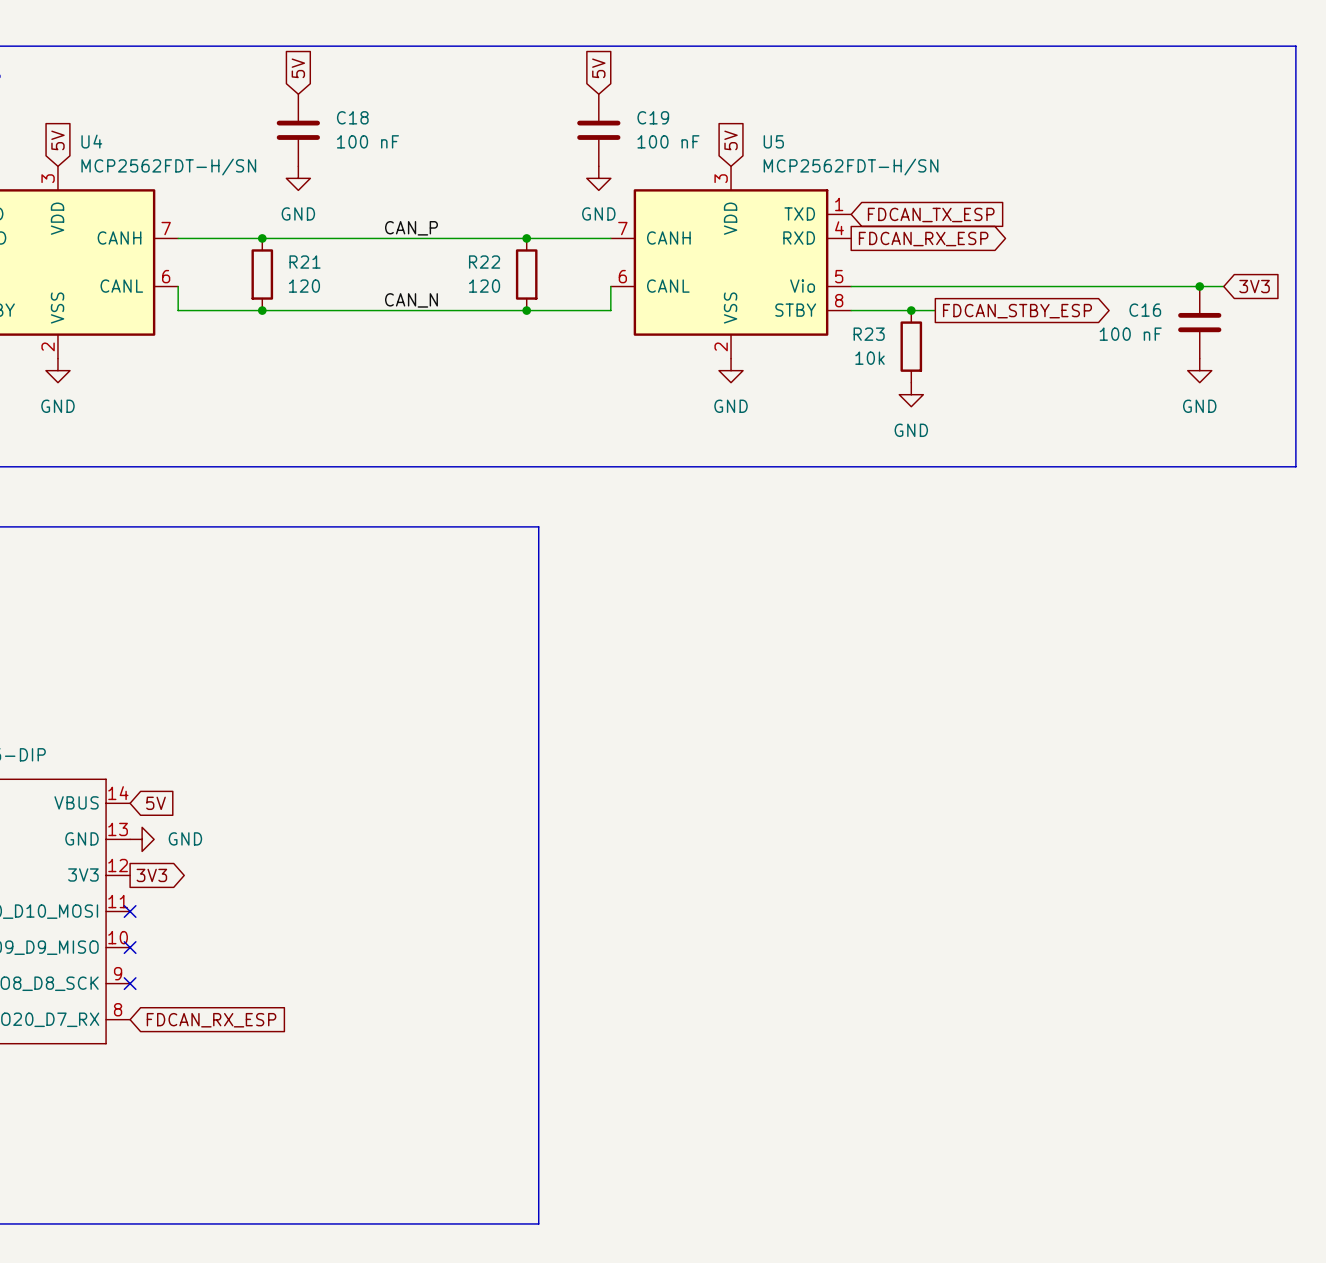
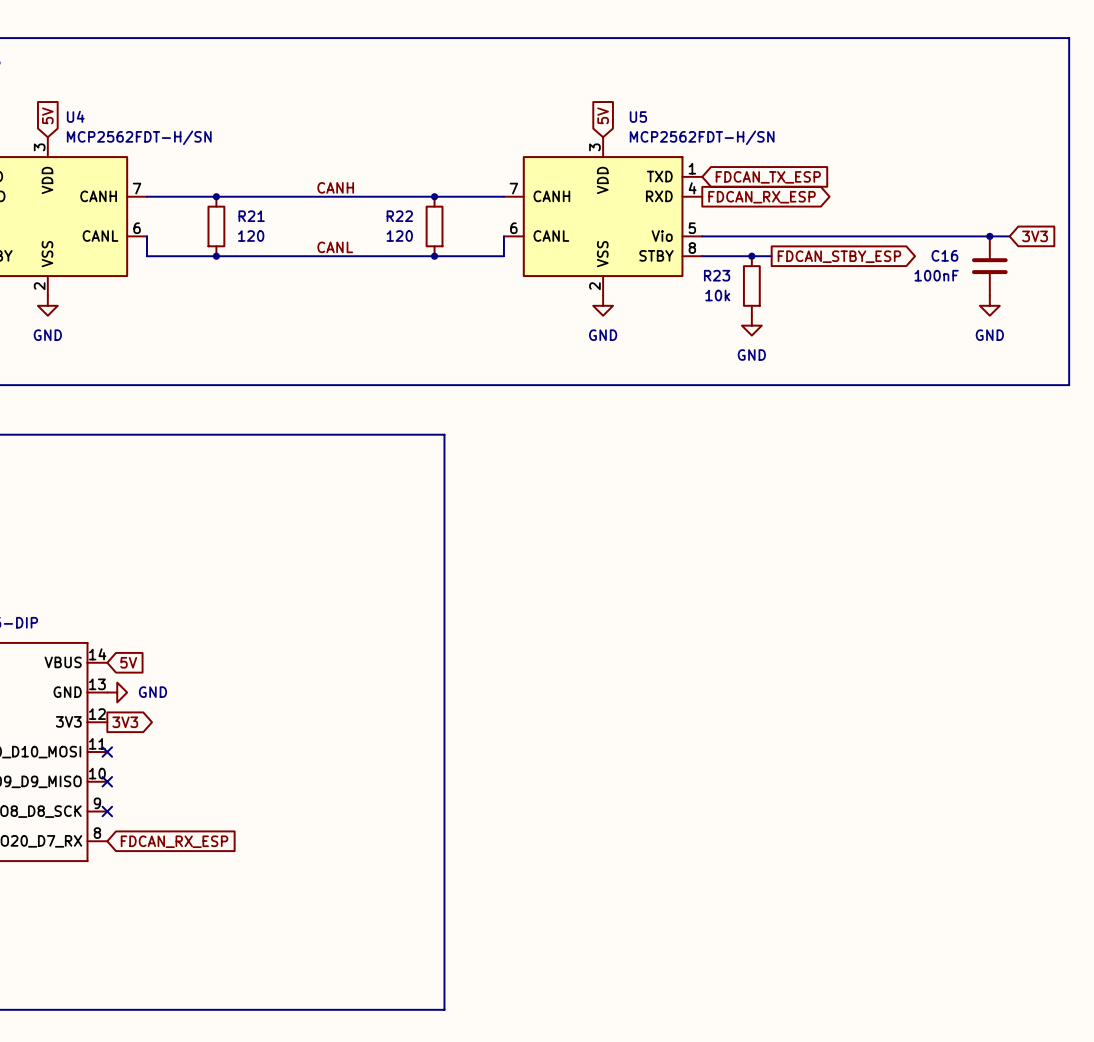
global label: 5V (298, 68) -> none
global label: 5V (598, 68) -> none
C18: 100 nF (298, 130) -> none
C19: 100 nF (598, 130) -> none
power symbol: GND (298, 178) -> none
power symbol: GND (598, 178) -> none
label: CAN_P (411, 228) -> CANH (335, 187)
label: CAN_N (411, 300) -> CANL (335, 247)
C16 value: 100 nF (1130, 334) -> 100nF (936, 275)

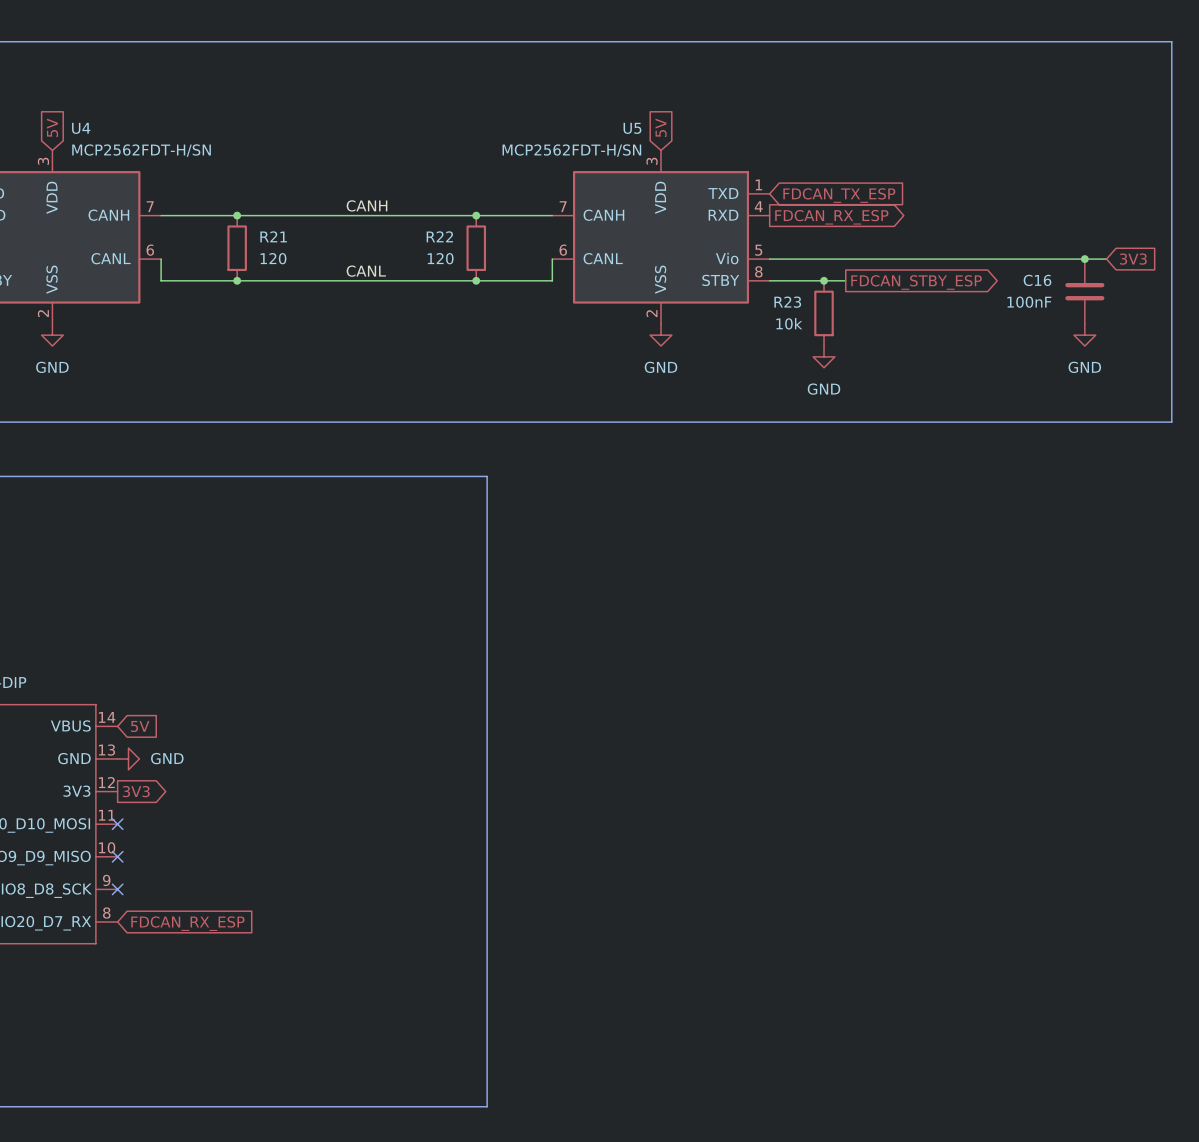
U5 name position: U5 (638, 117) -> U5 (632, 128)
U5 value position: MCP2562FDT-H/SN (702, 137) -> MCP2562FDT-H/SN (571, 150)

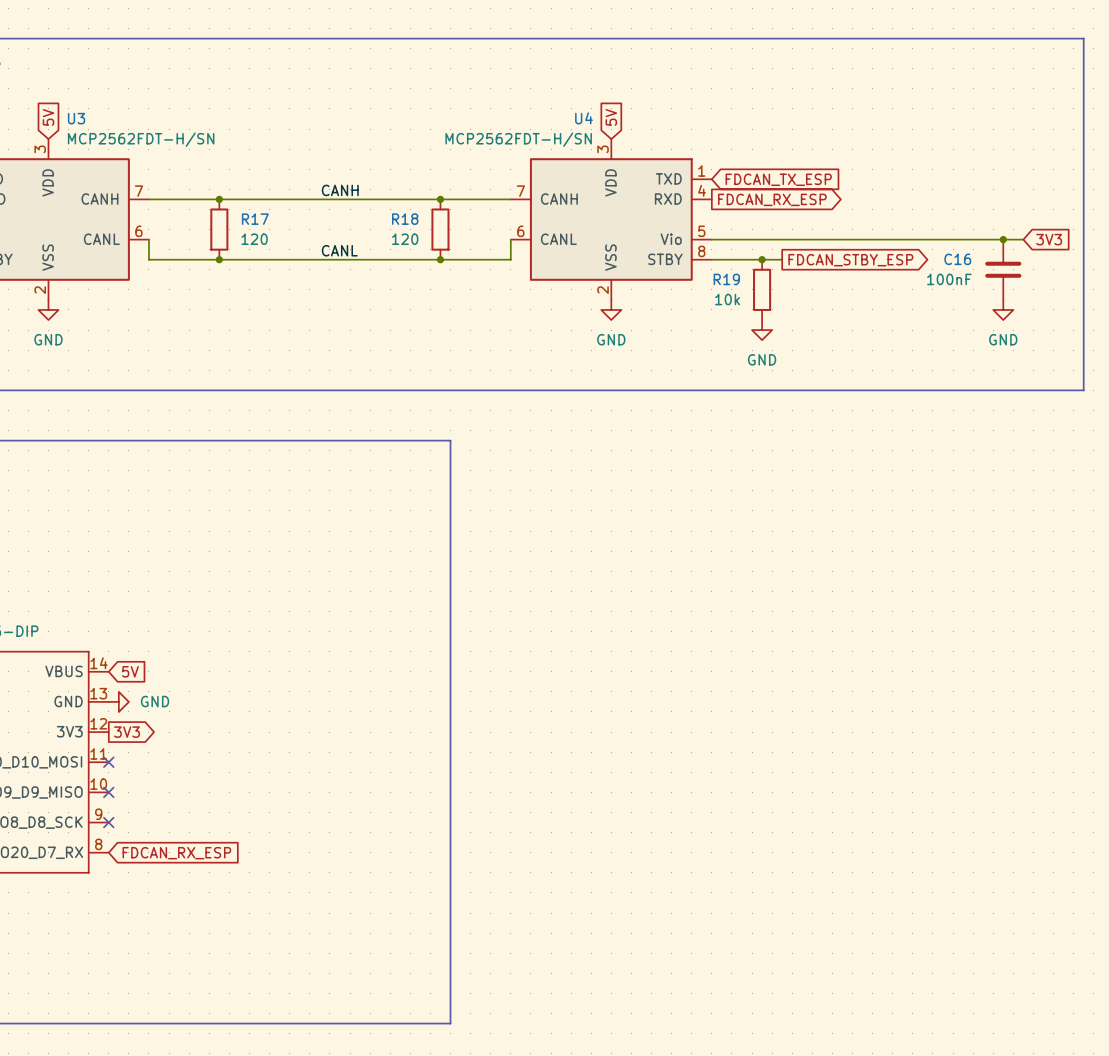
U4 name: U4 (81, 128) -> U3 (76, 118)
U5 name: U5 (632, 128) -> U4 (583, 118)
R21 name: R21 (273, 236) -> R17 (255, 219)
R22 name: R22 (439, 236) -> R18 (405, 219)
R23 name: R23 (787, 302) -> R19 (726, 279)

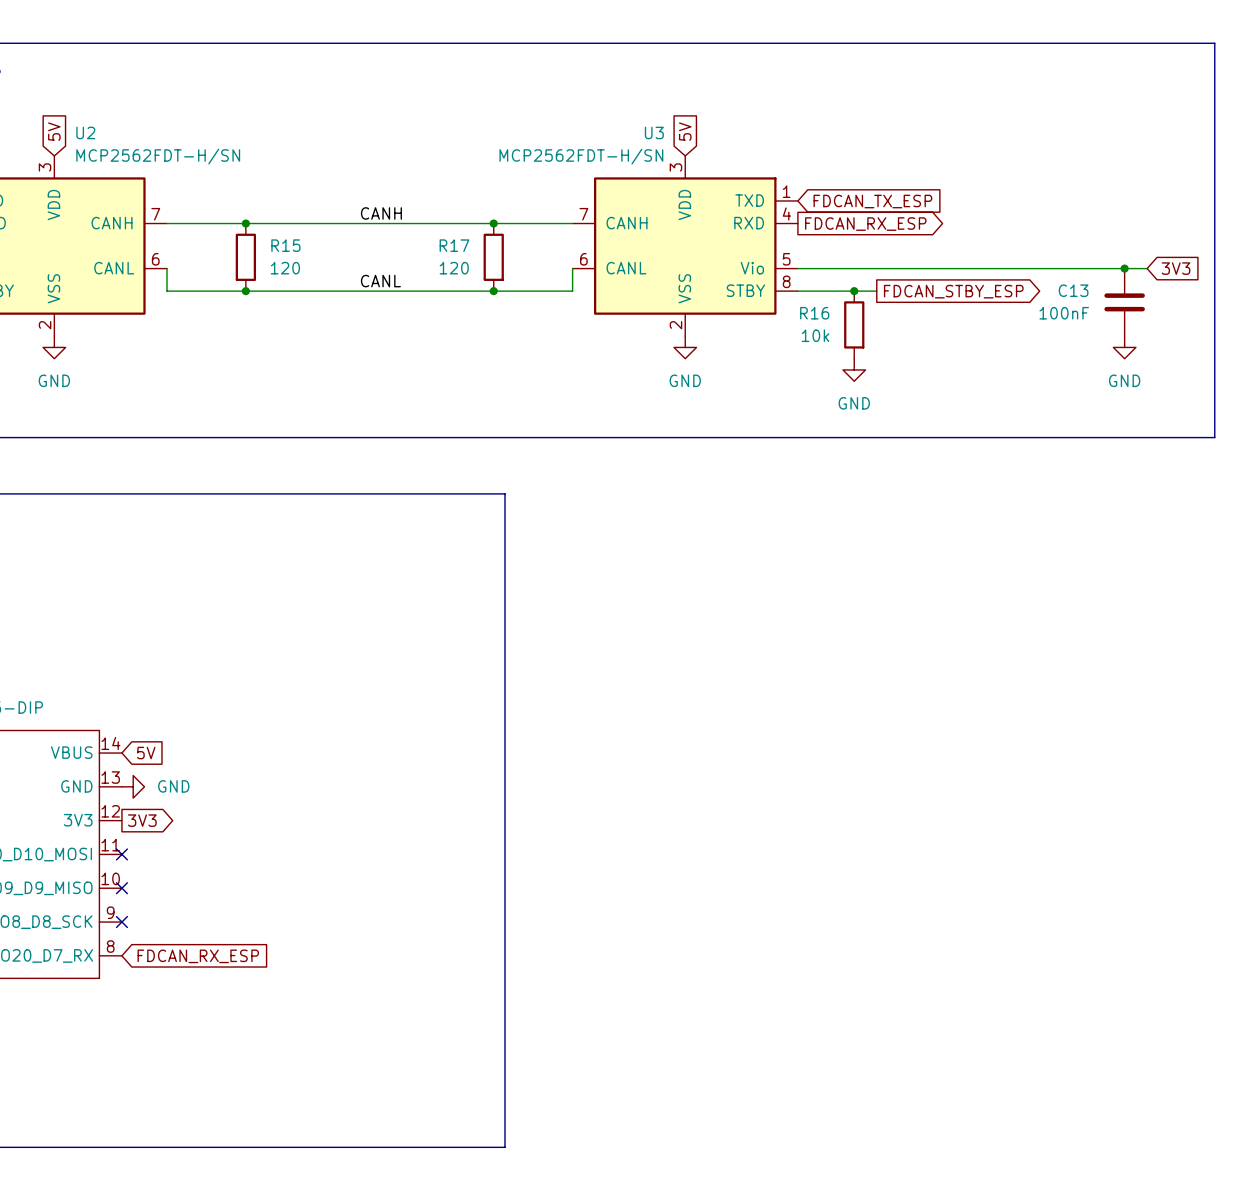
U3 name: U3 (76, 118) -> U2 (85, 132)
U4 name: U4 (583, 118) -> U3 (654, 132)
R17 name: R17 (255, 219) -> R15 (285, 245)
R18 name: R18 (405, 219) -> R17 (454, 245)
C16 name: C16 (957, 259) -> C13 (1073, 290)
R19 name: R19 (726, 279) -> R16 (814, 313)

